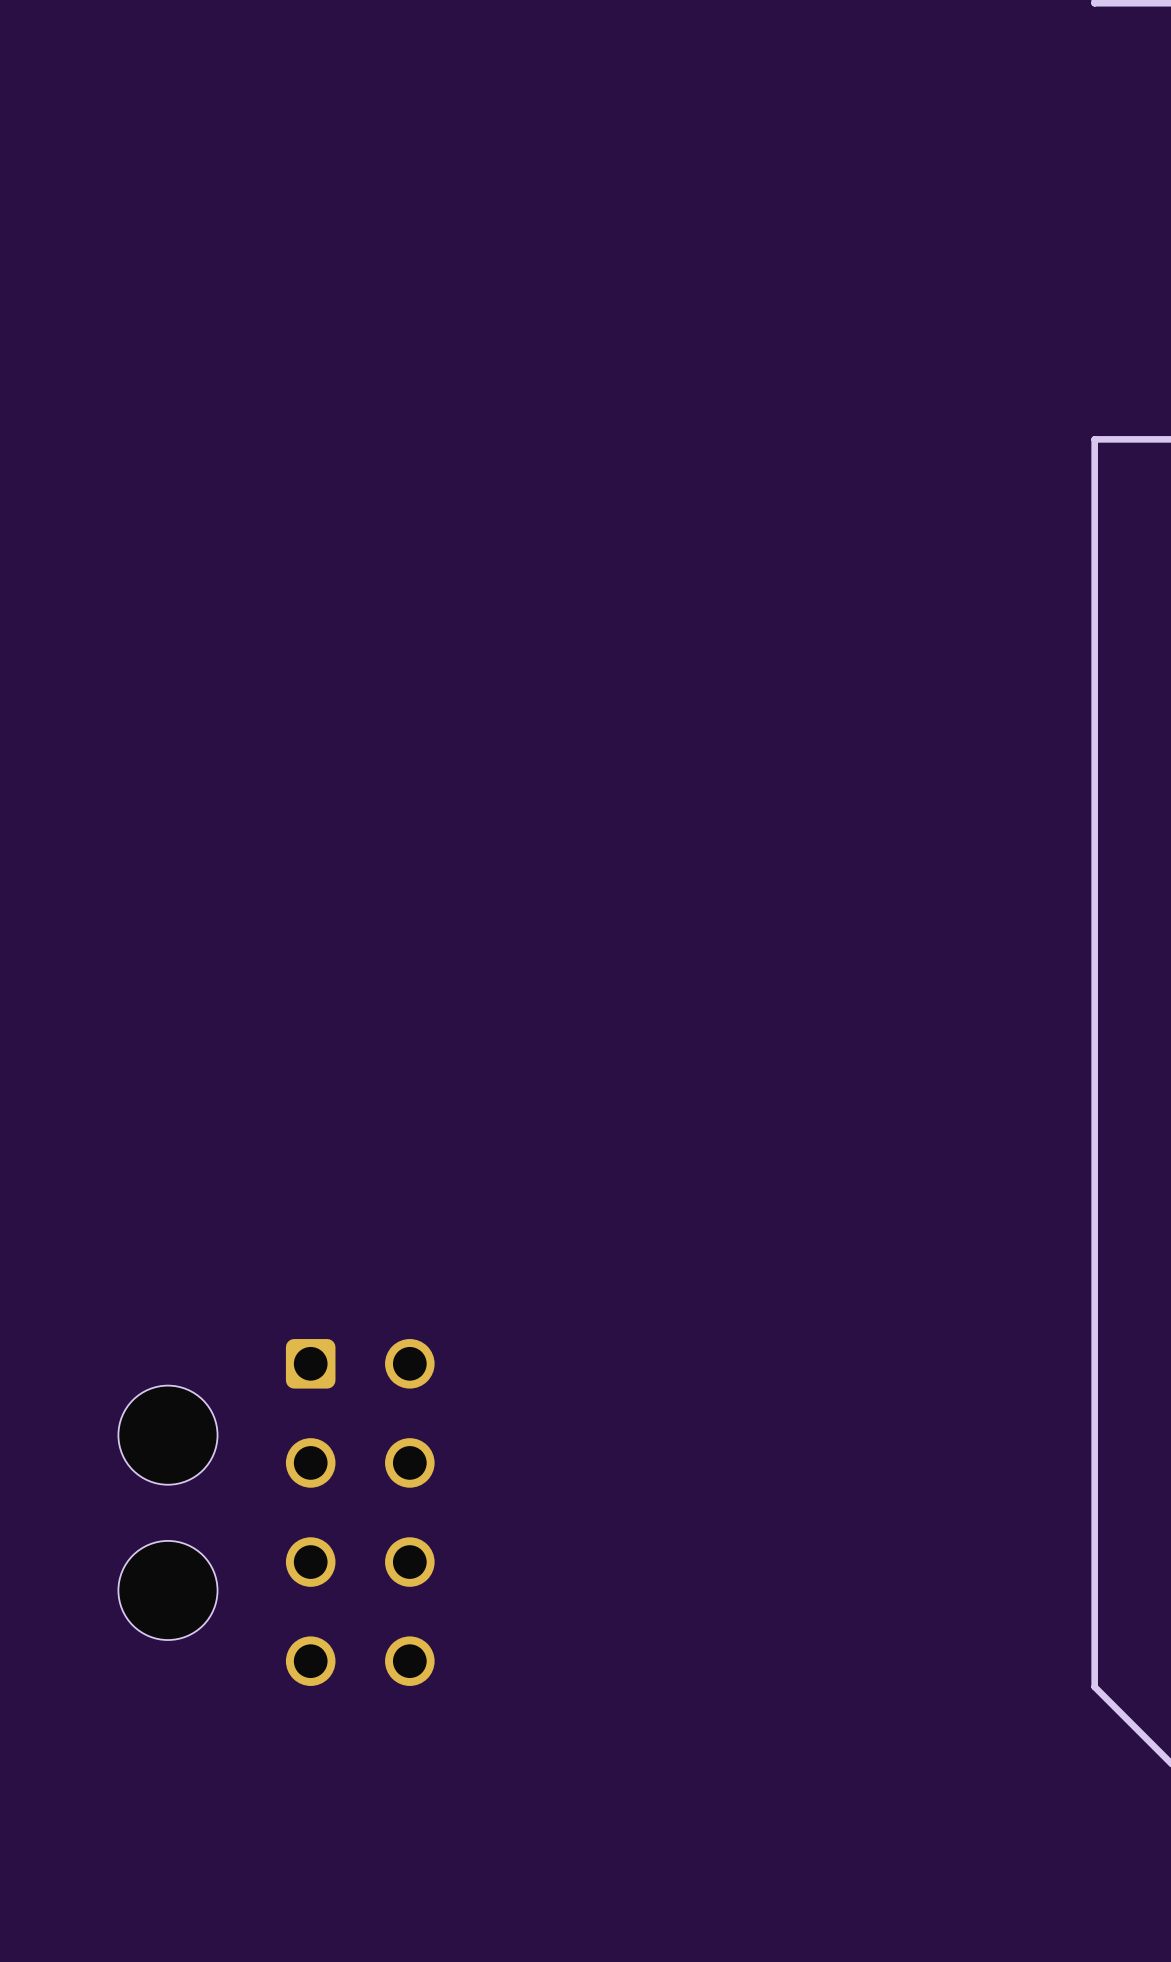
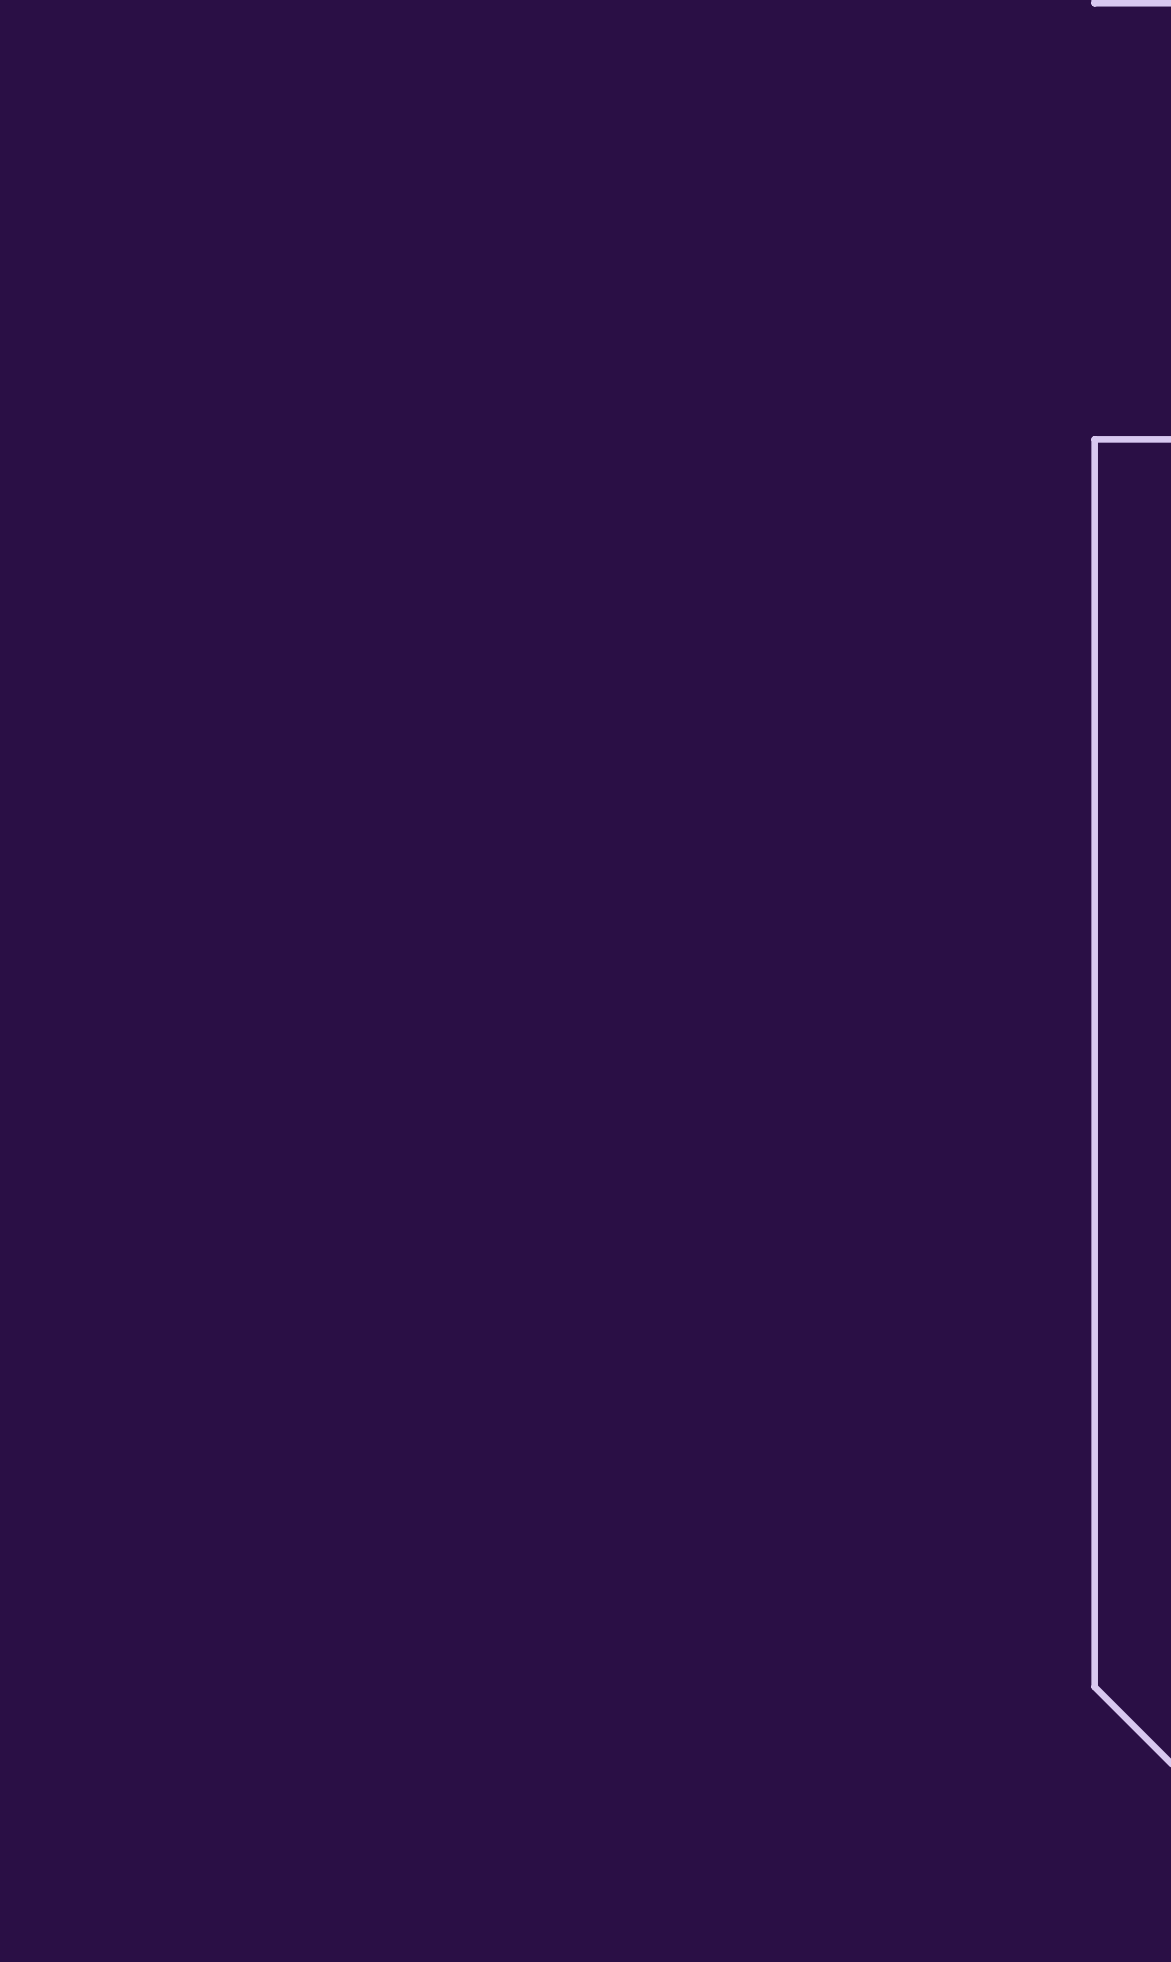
part: (276, 1512) -> none

